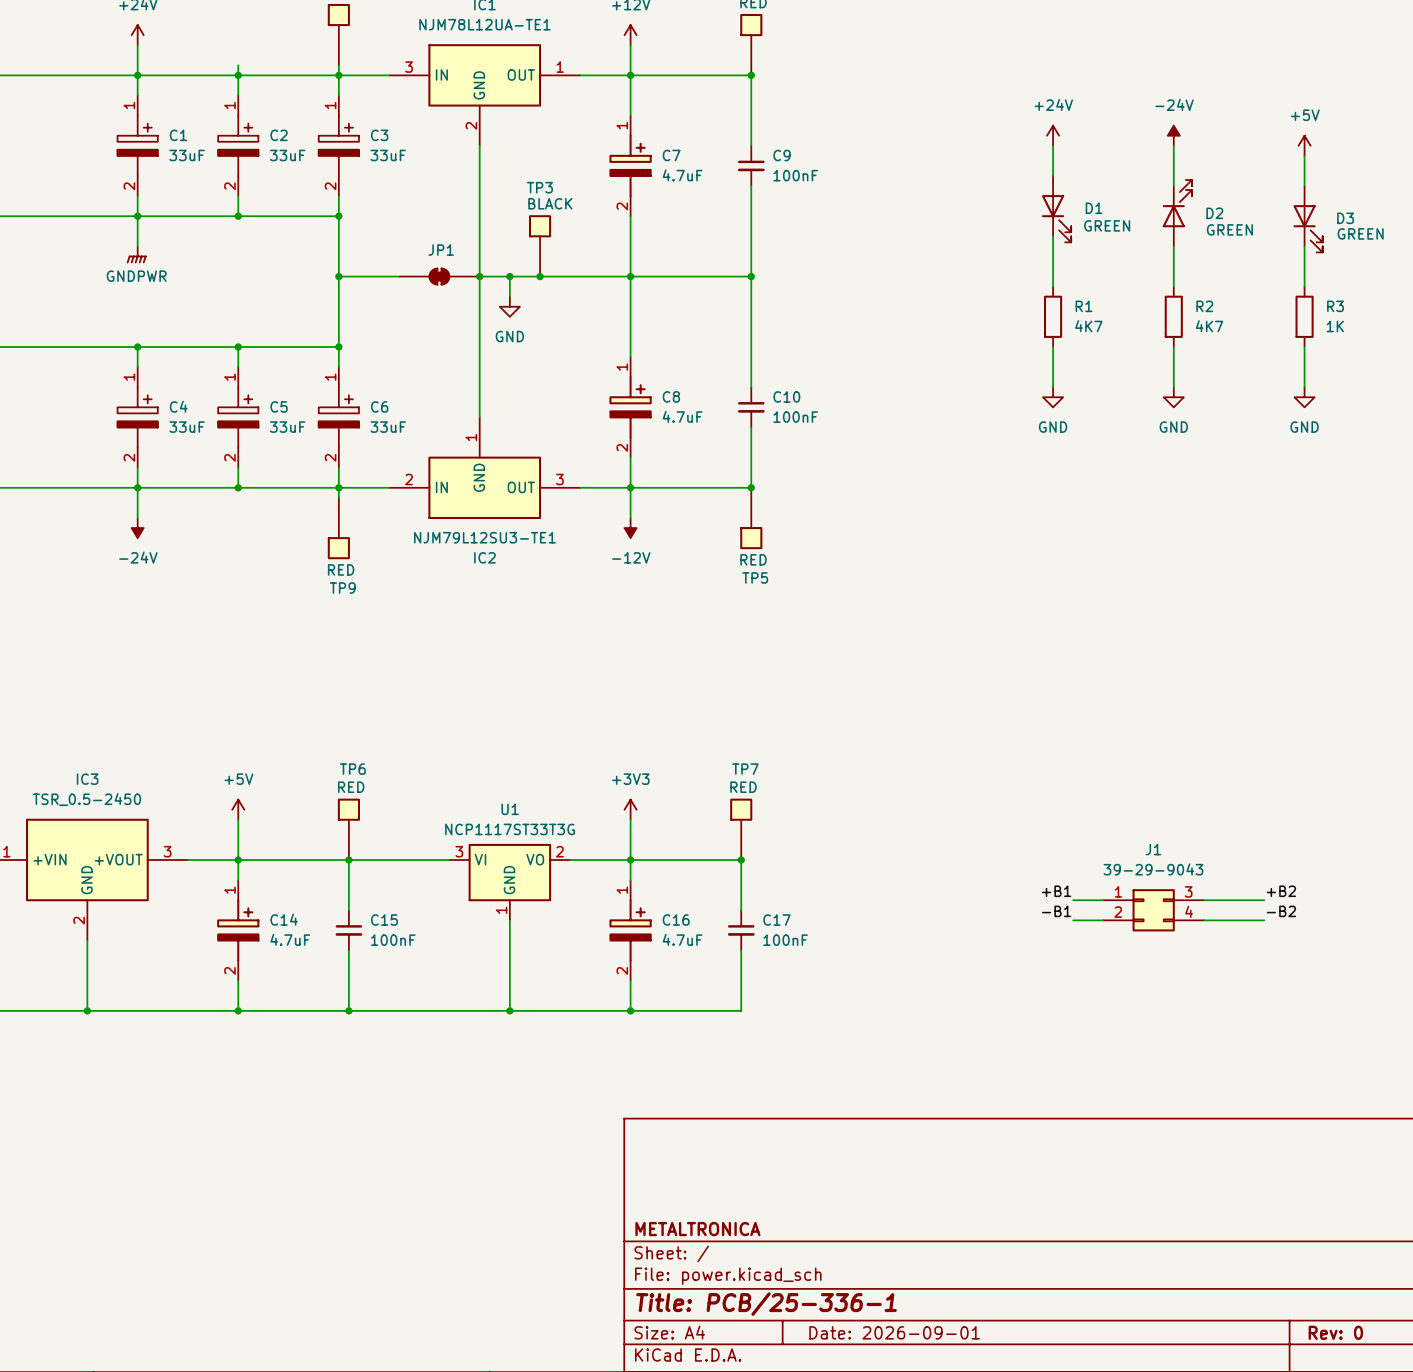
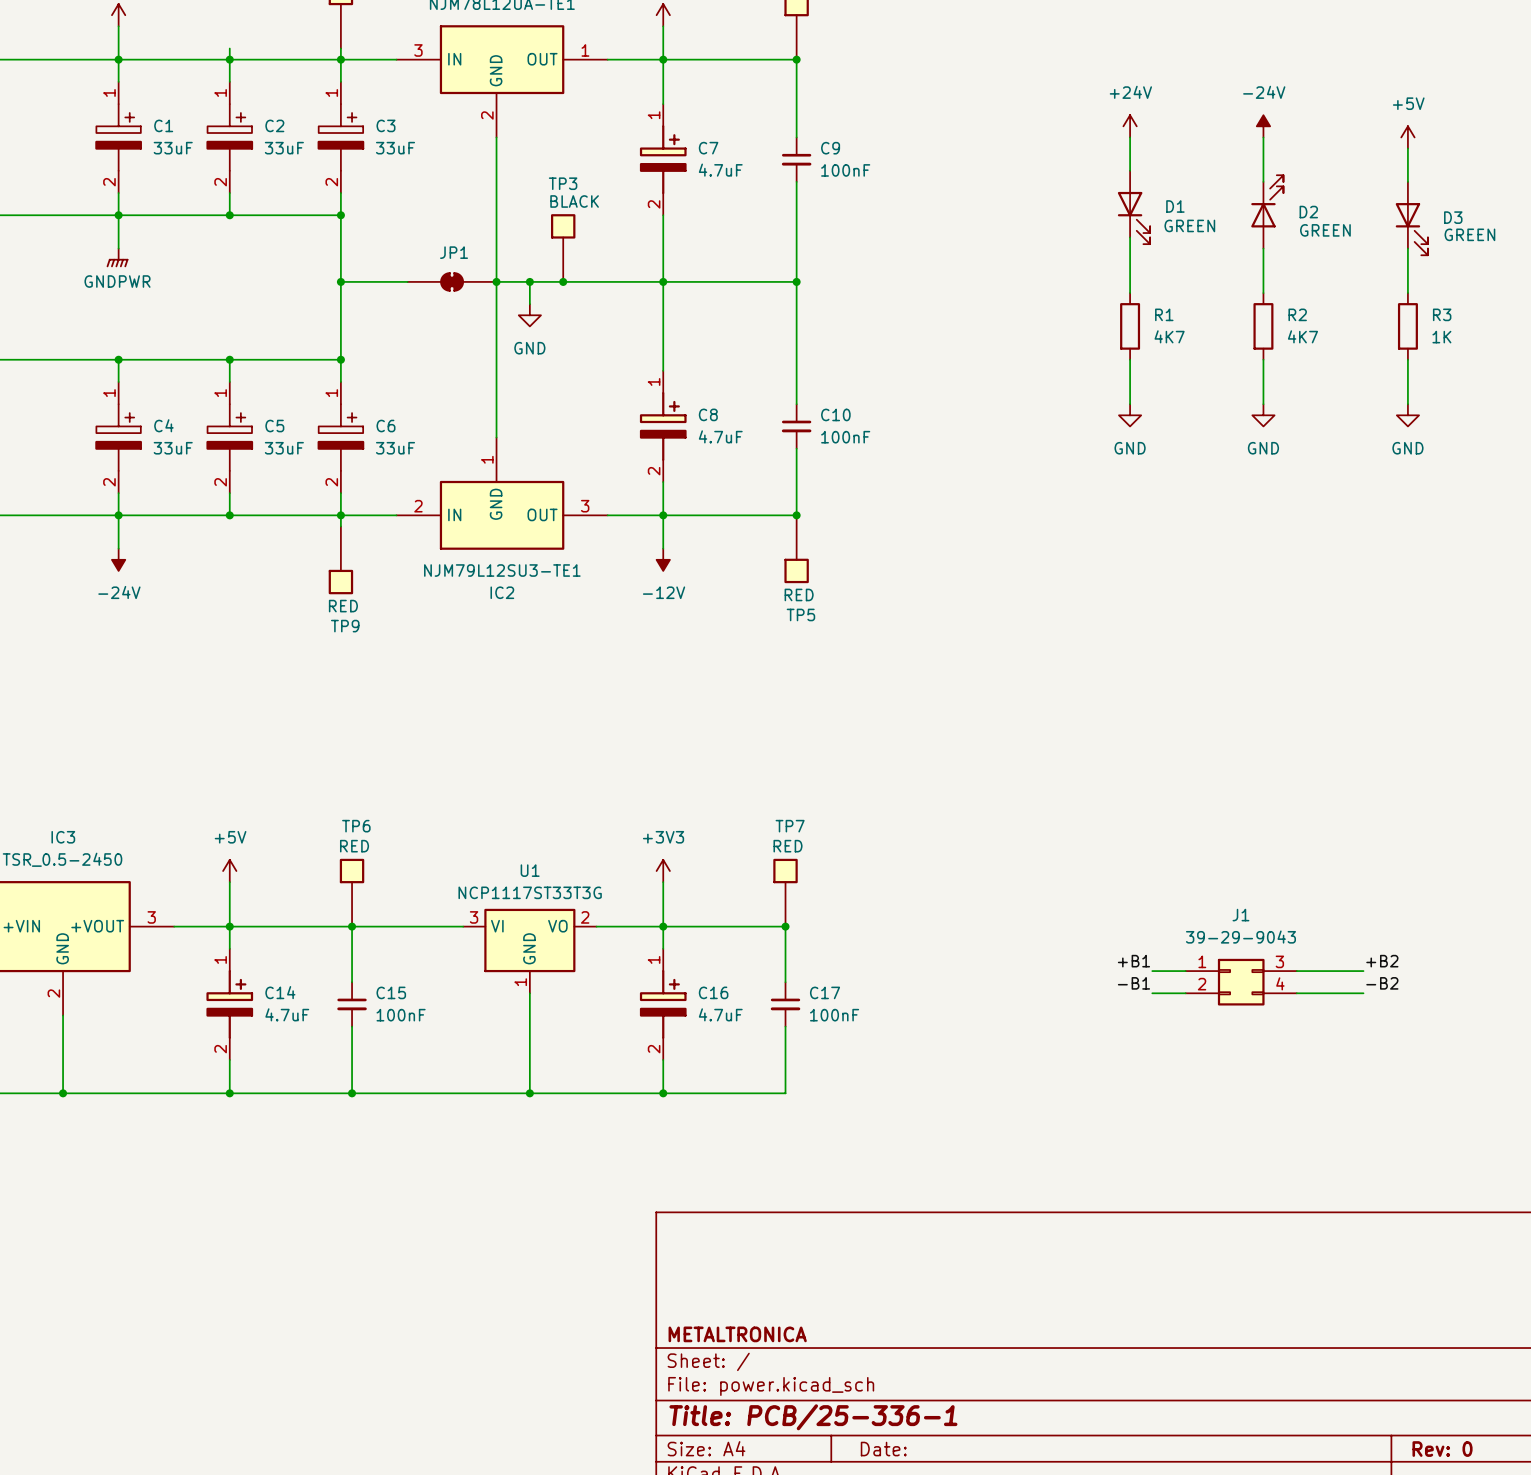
title block: Date: 2026-09-01 (894, 1332) -> Date: (883, 1449)

